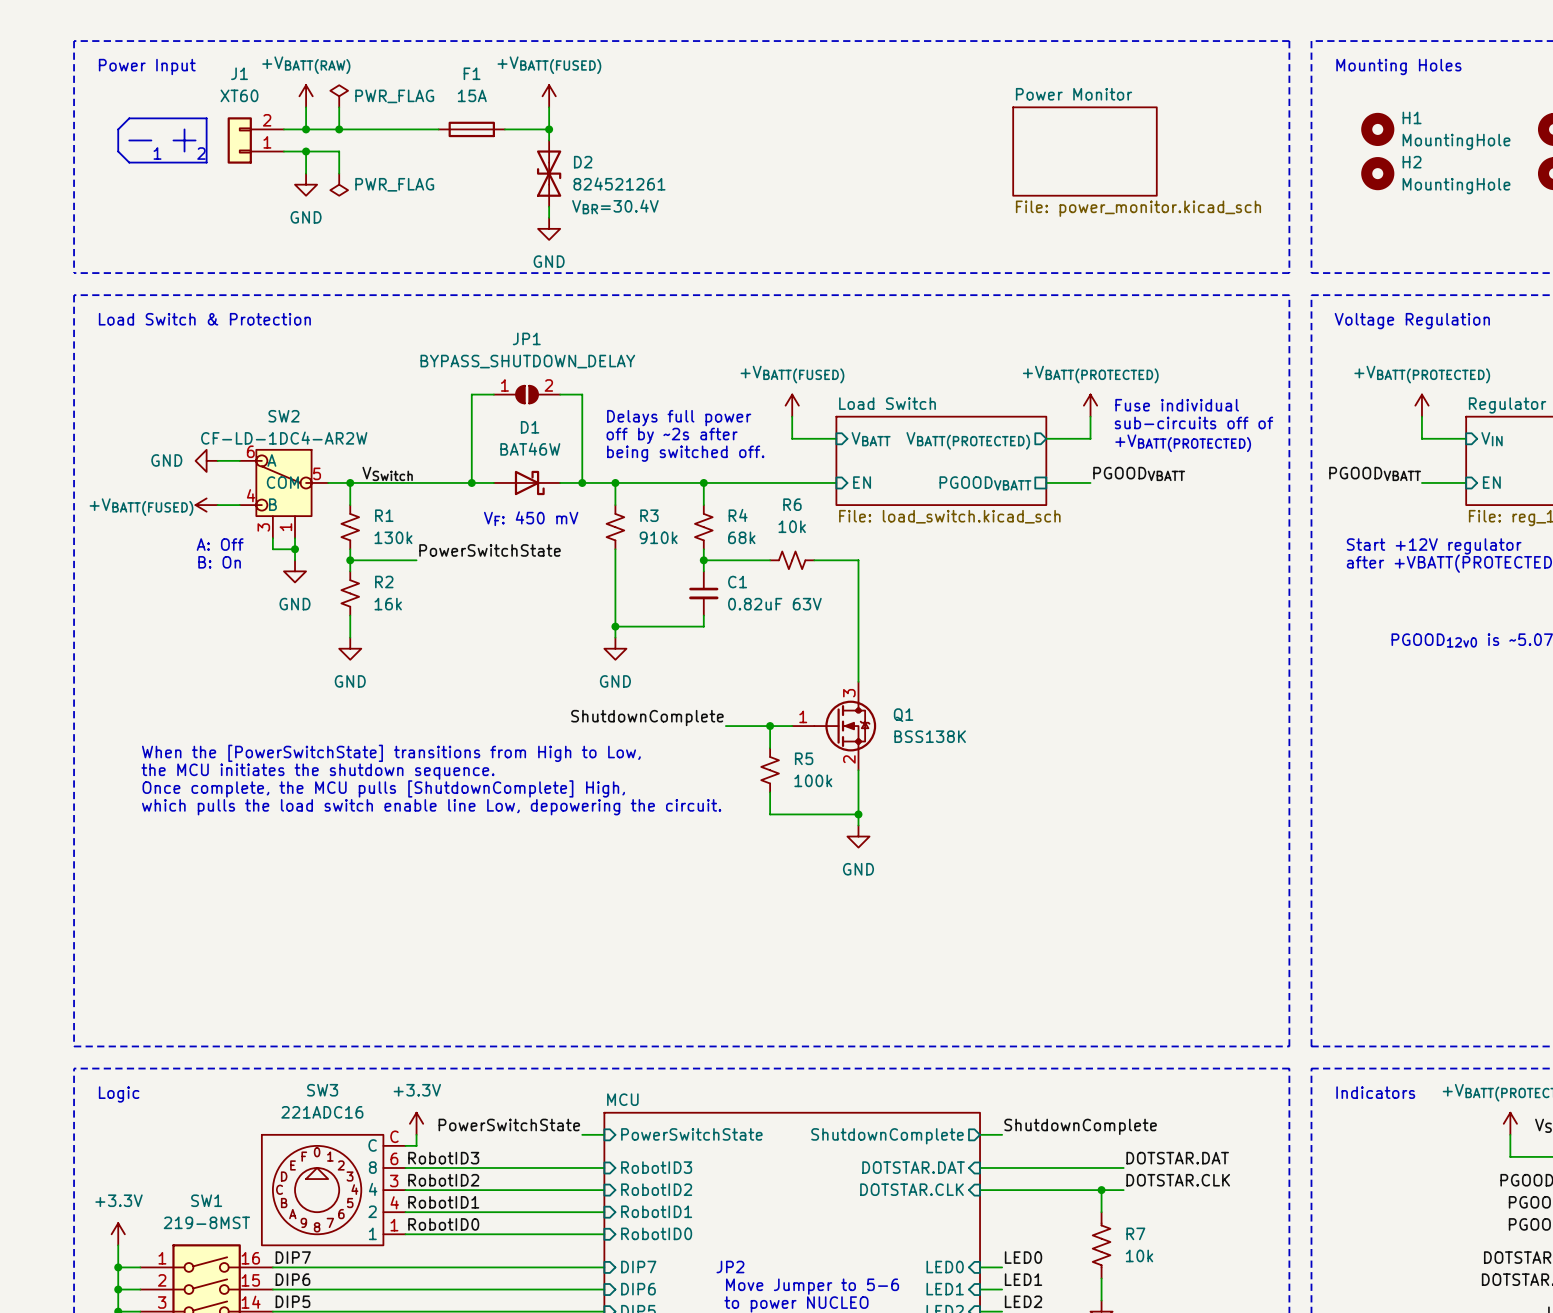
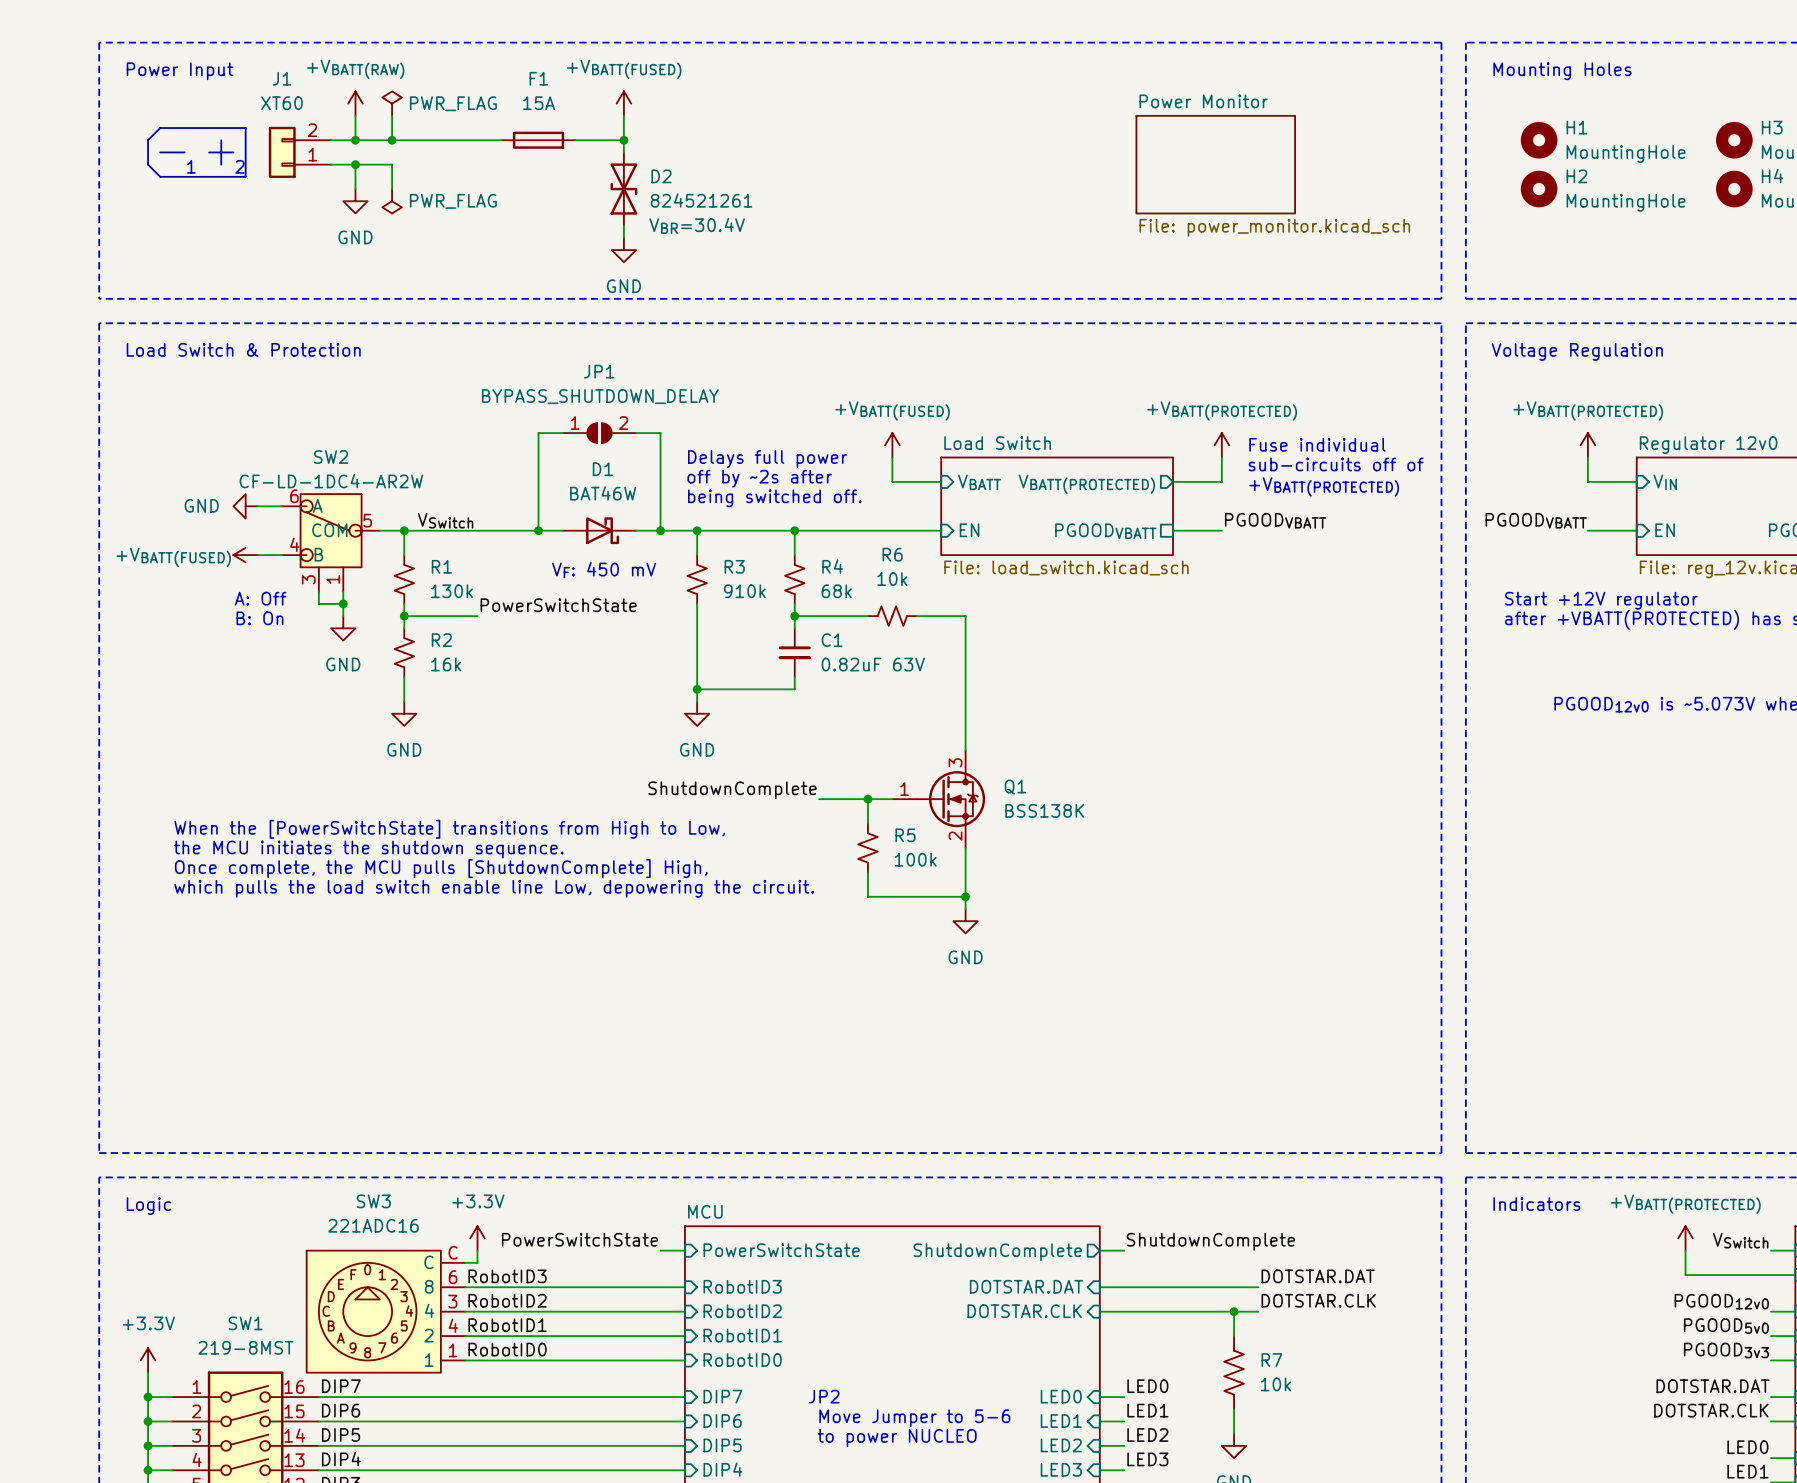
SW3 symbol: [261, 1134, 406, 1246] -> [306, 1250, 466, 1373]

